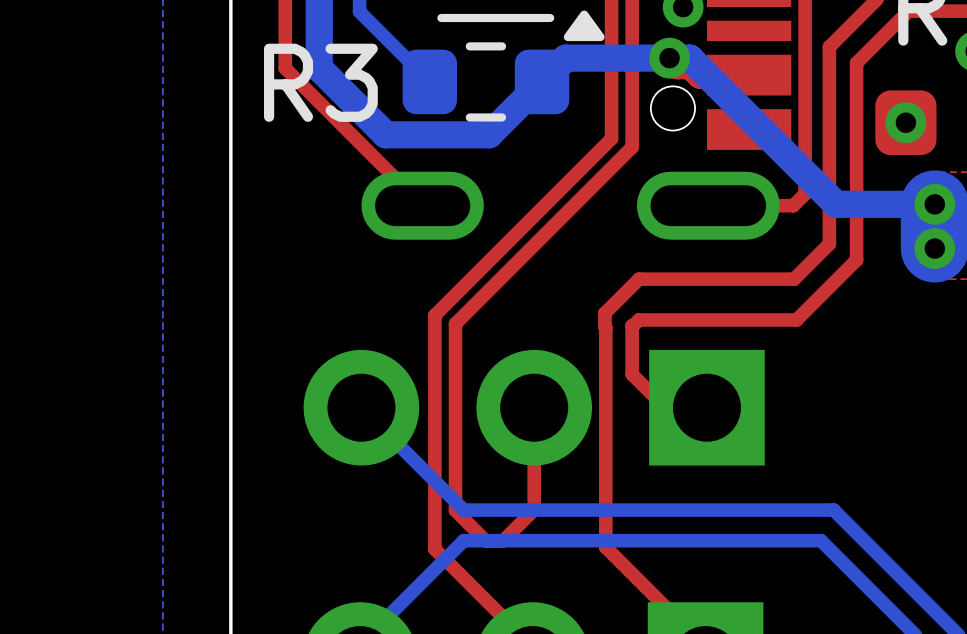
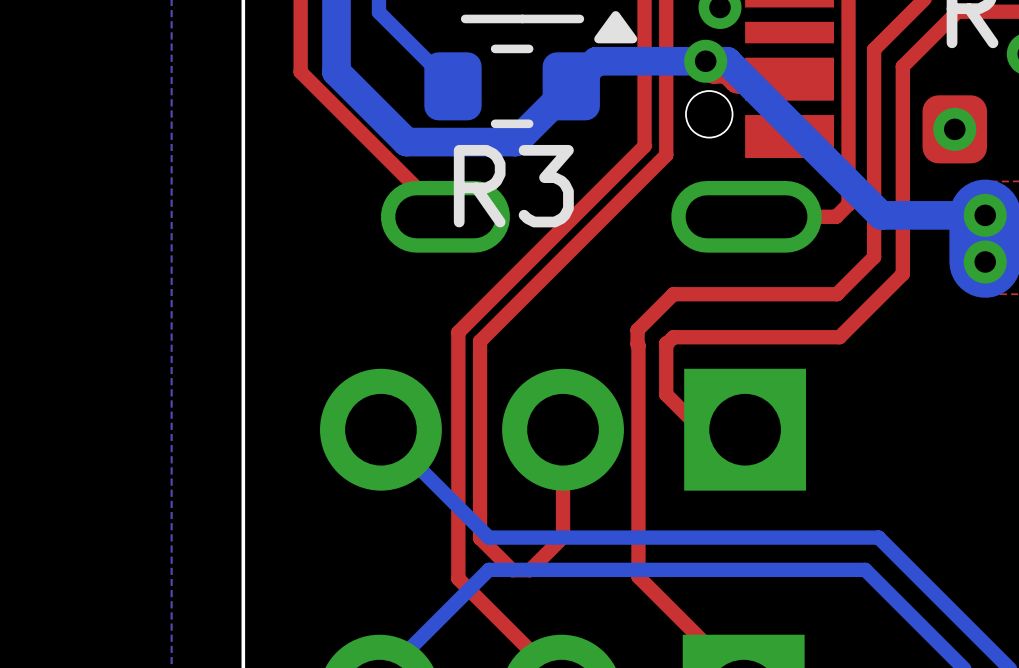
R3 name position: R3 (320, 82) -> R3 (513, 186)

